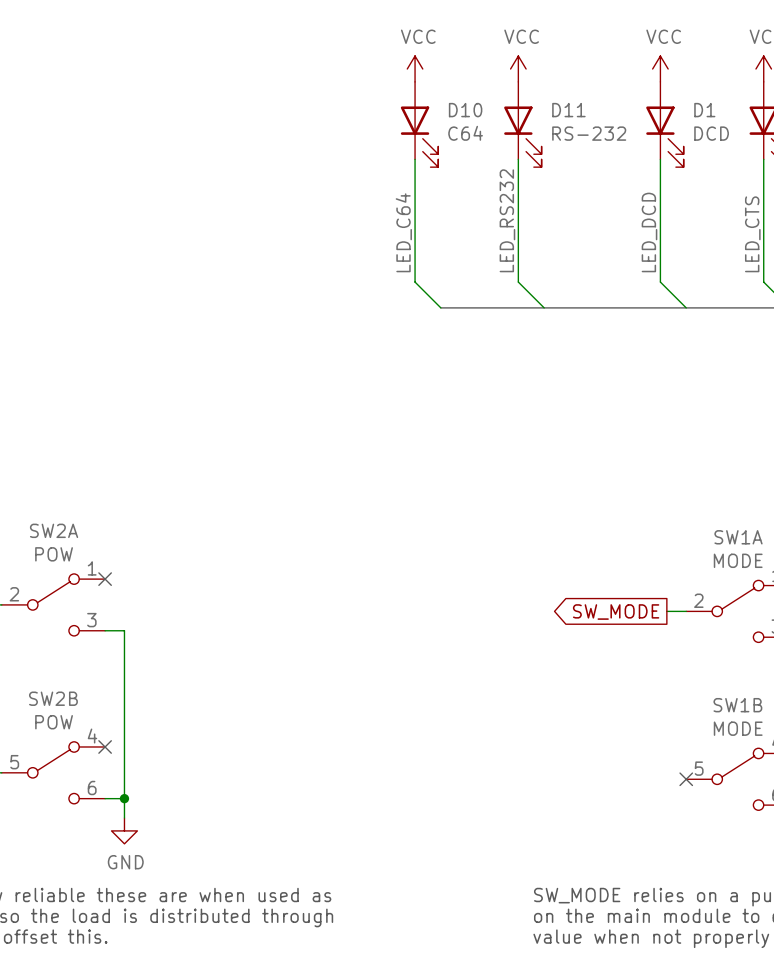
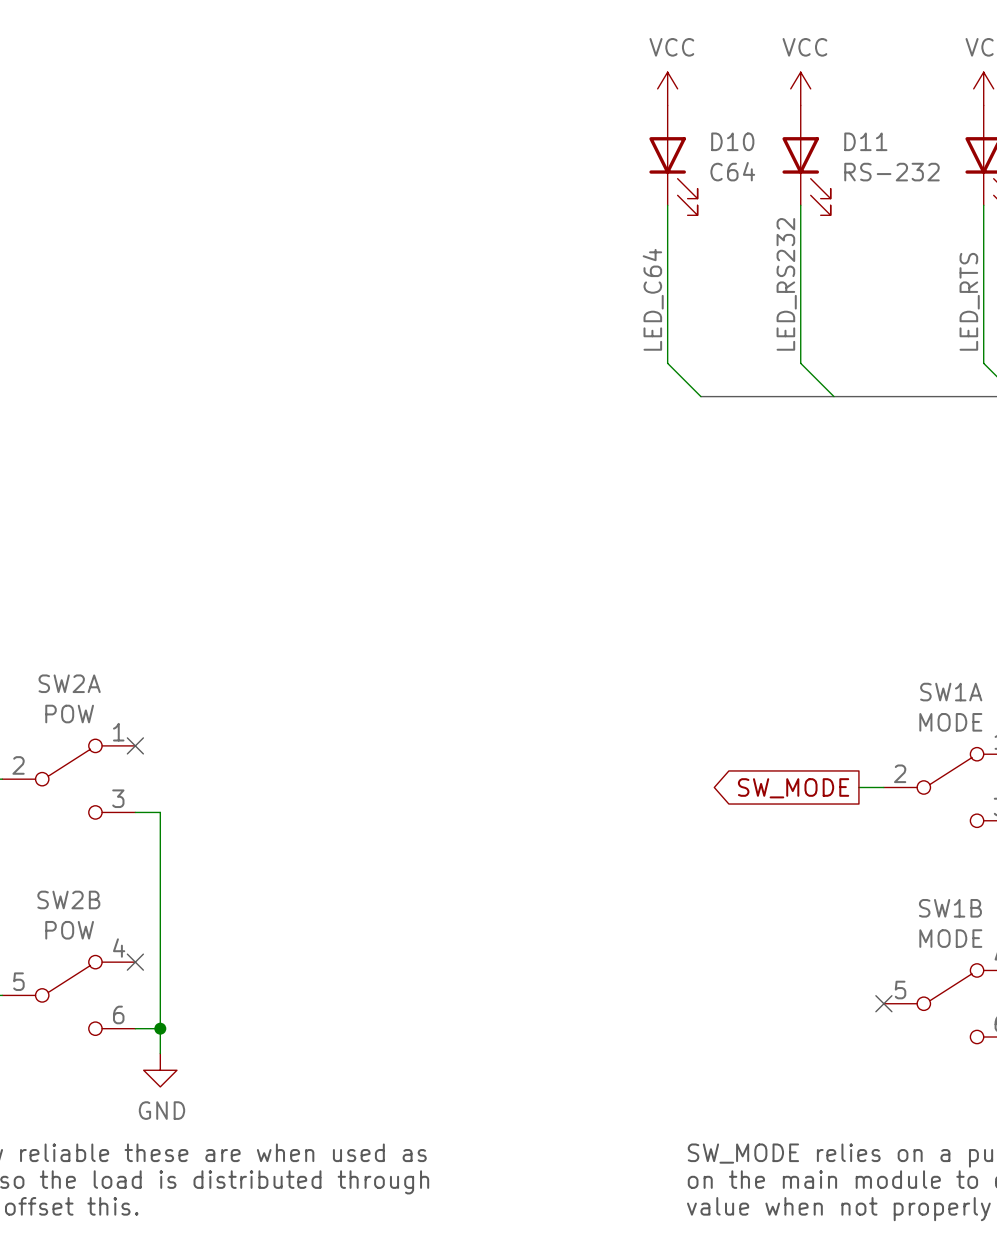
power symbol: VCC (415, 68) -> none
power symbol position: VCC (660, 68) -> VCC (800, 88)
D11 name: D11 (568, 110) -> D10 (732, 141)
D10: C64 (419, 124) -> none
D11: none -> RS-232 (806, 160)
D1: DCD (664, 124) -> none
D11 value: RS-232 (589, 133) -> C64 (732, 171)
wire: (415, 159) (415, 282) (440, 307) -> none
wire: (660, 159) (660, 282) (686, 307) -> (800, 205) (800, 363) (833, 396)
label: LED_RS232 (507, 220) -> LED_C64 (653, 299)
label: none -> LED_RS232 (786, 284)
label: LED_C64 (403, 232) -> none
label: LED_DCD (649, 232) -> none
label: LED_CTS (752, 234) -> LED_RTS (969, 301)
bus: (440, 307) (544, 307) -> none

